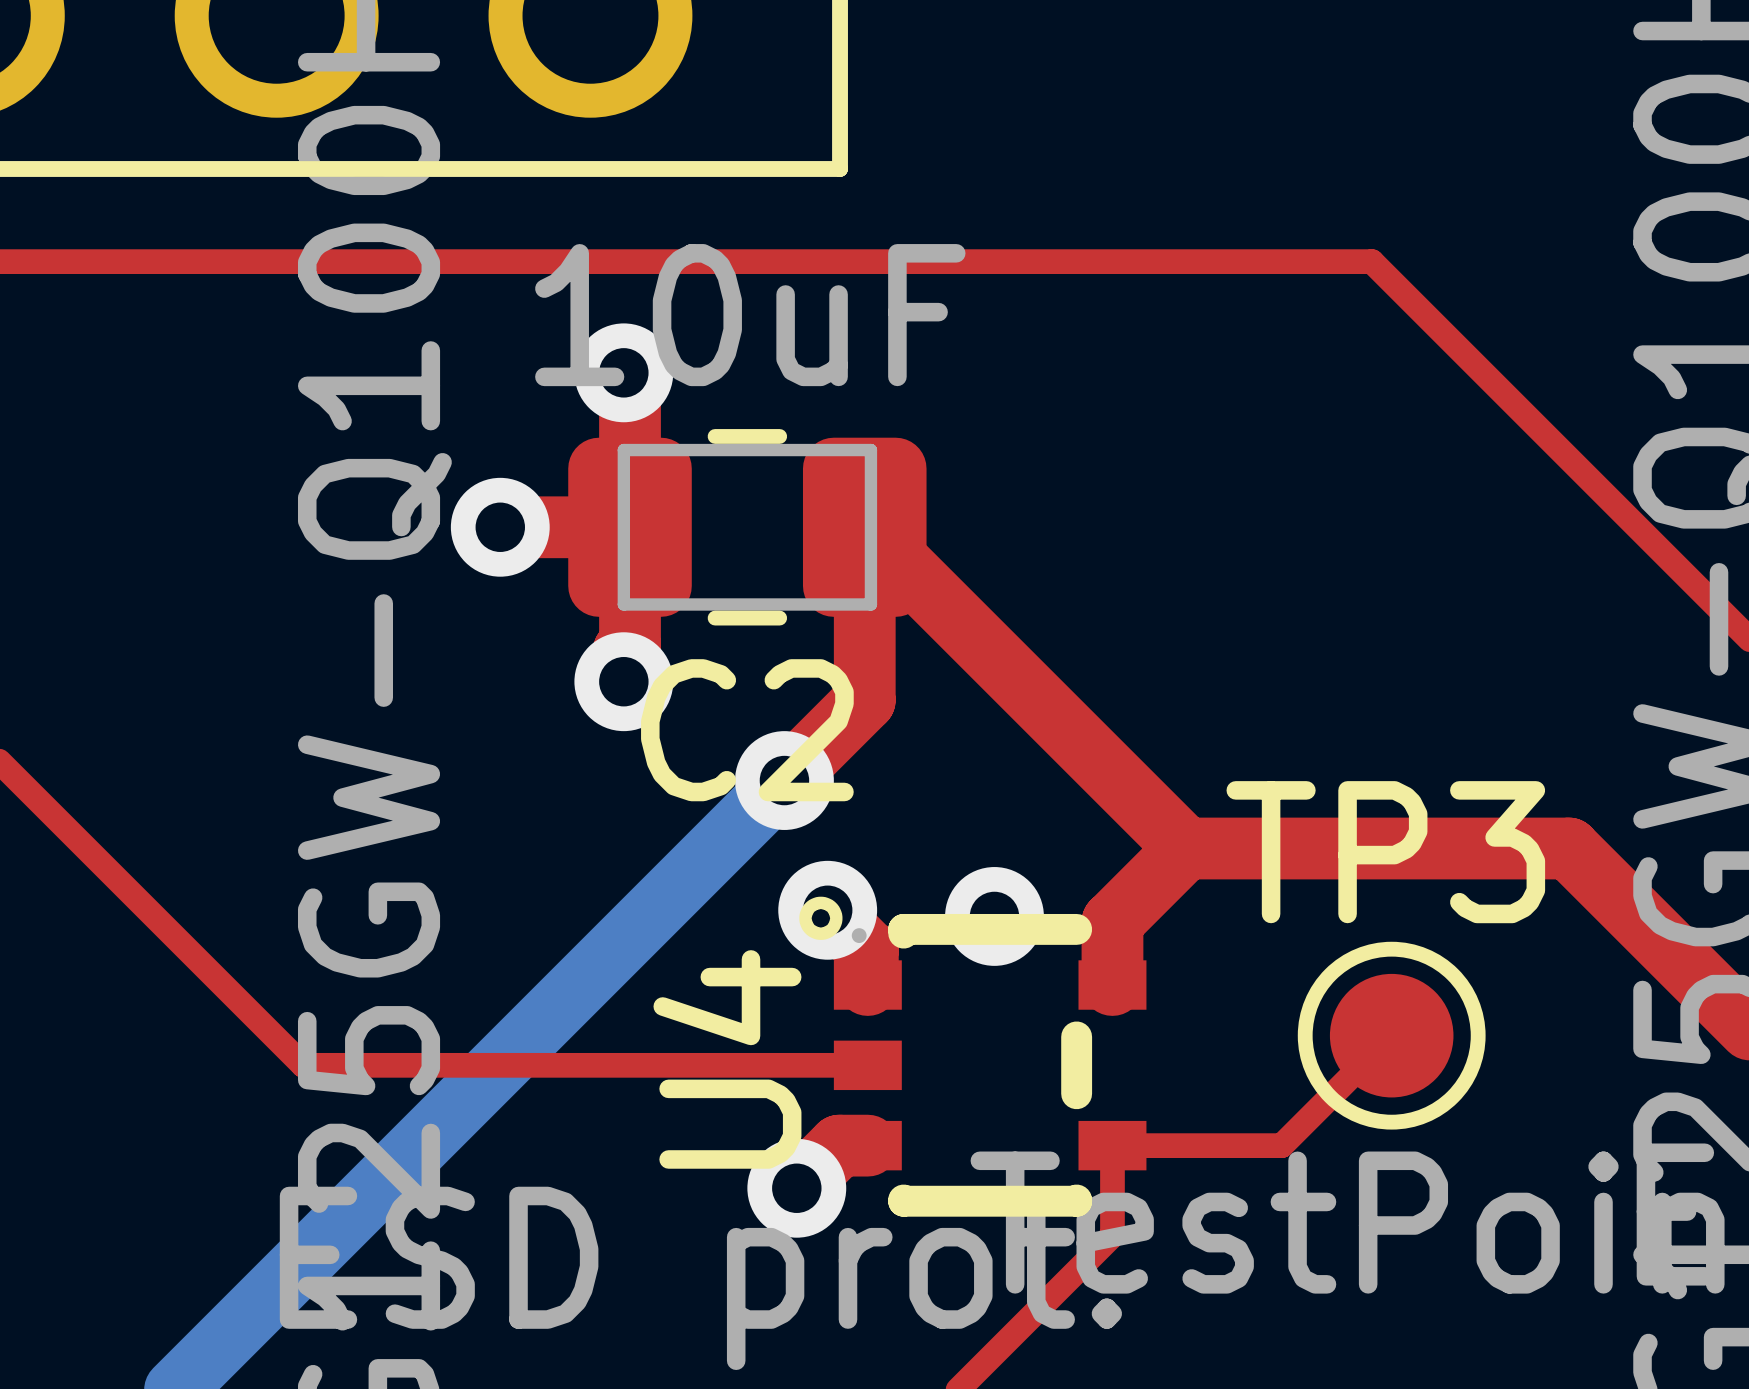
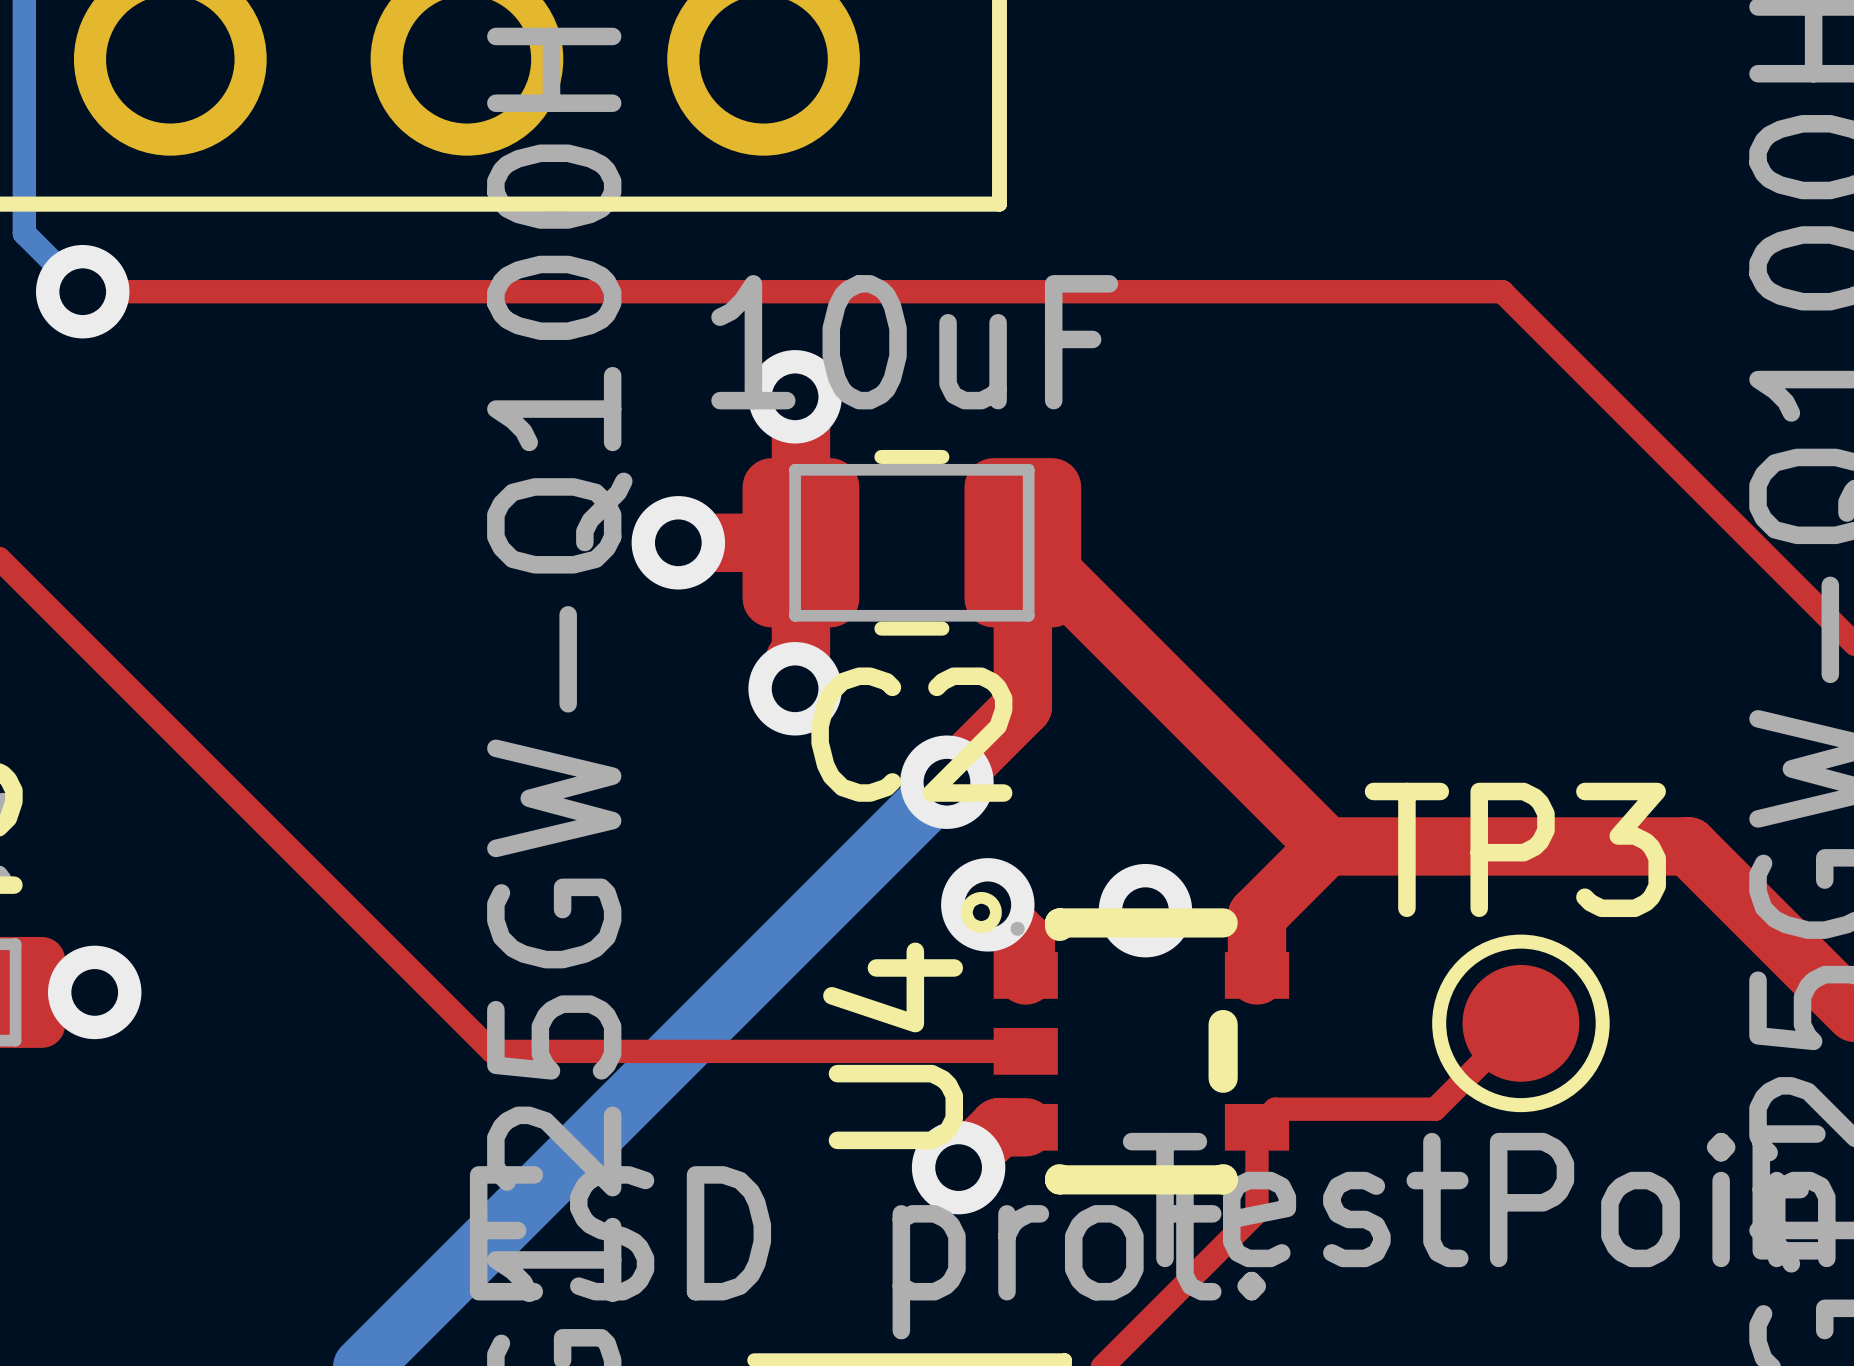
top track: (1300, 1126) (1281, 1145) (1112, 1145) -> (1435, 1109) (1275, 1109) (1257, 1127)

